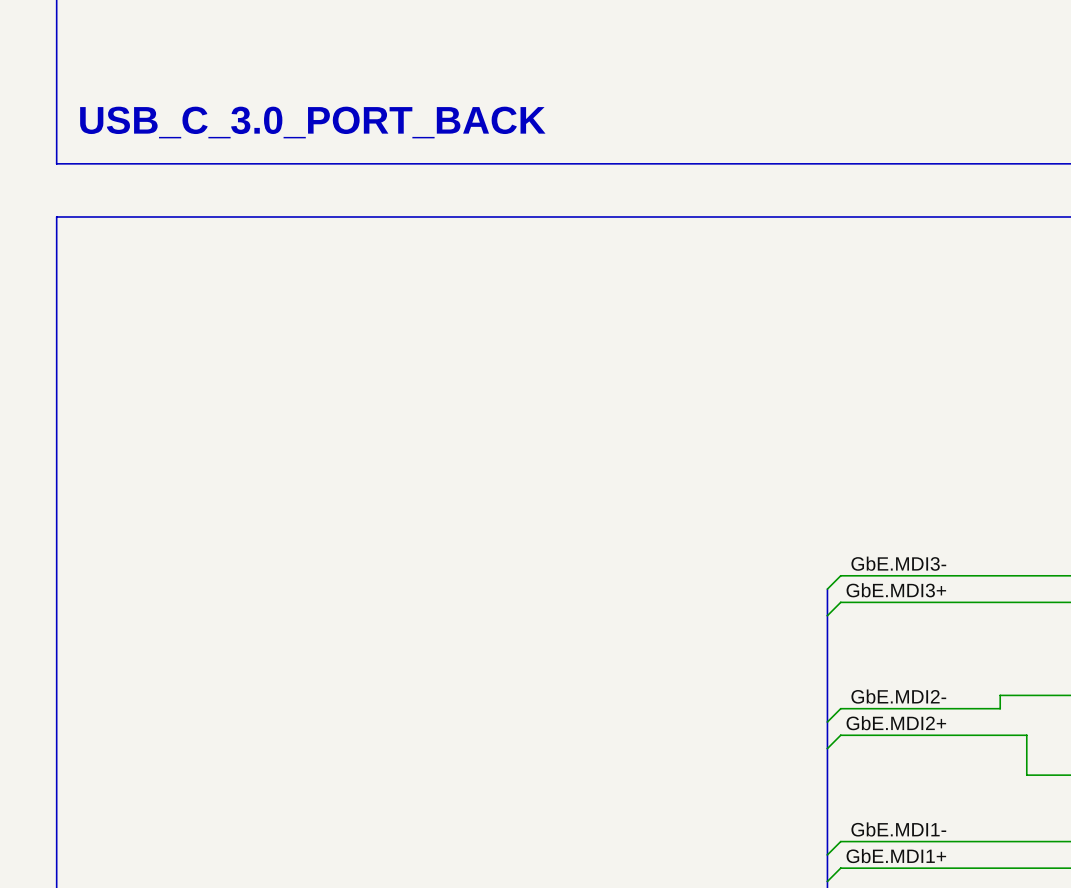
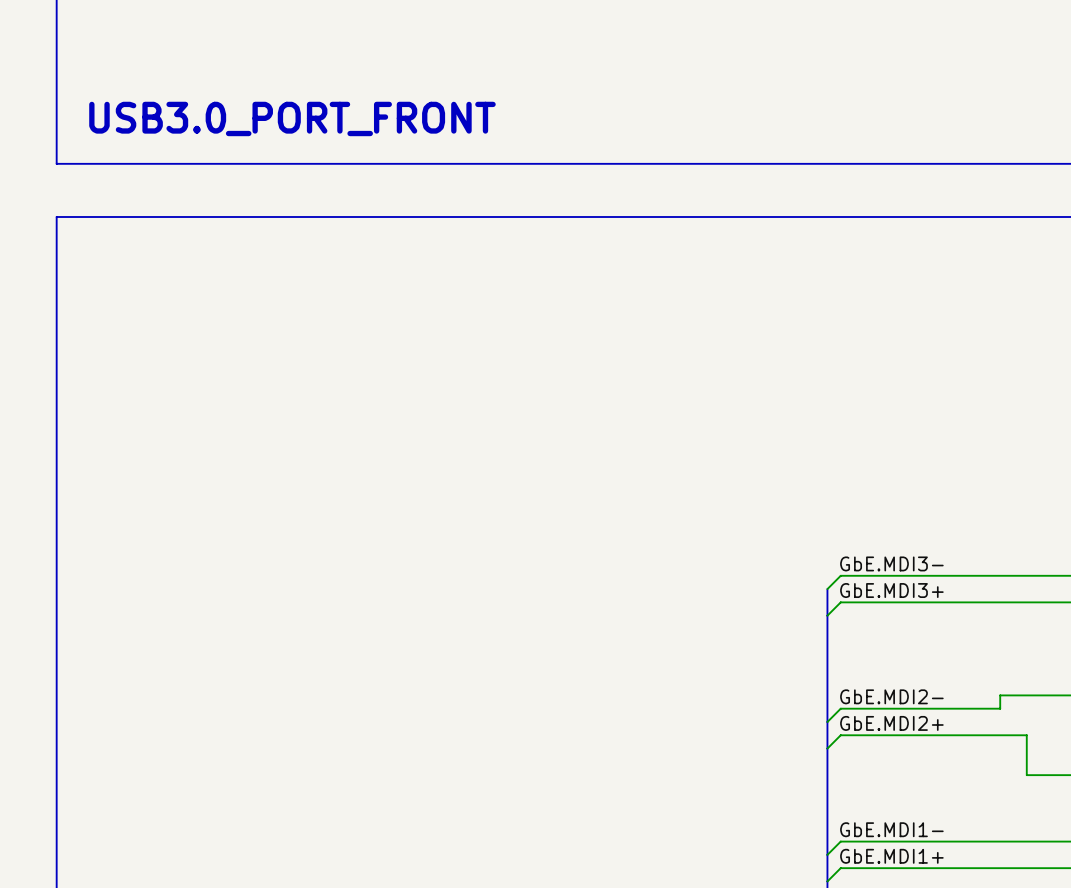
text: USB_C_3.0_PORT_BACK (312, 122) -> USB3.0_PORT_FRONT (292, 118)

